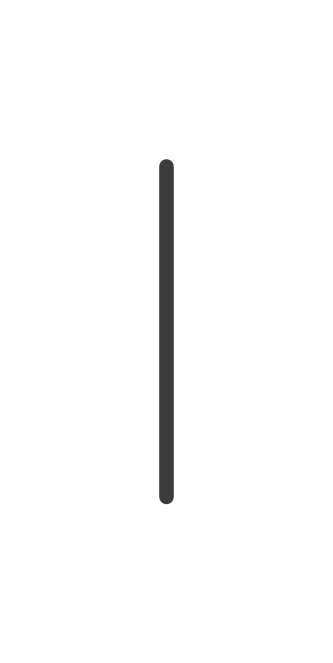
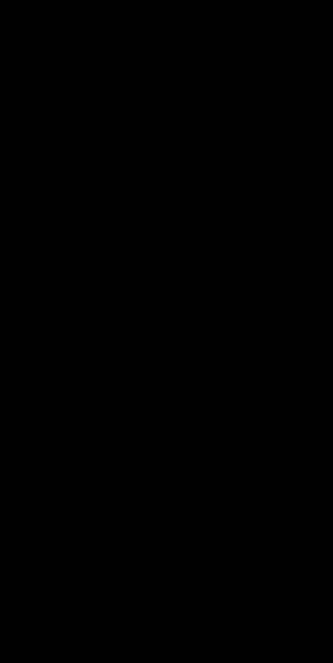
line: (166, 166) (166, 496) -> none

